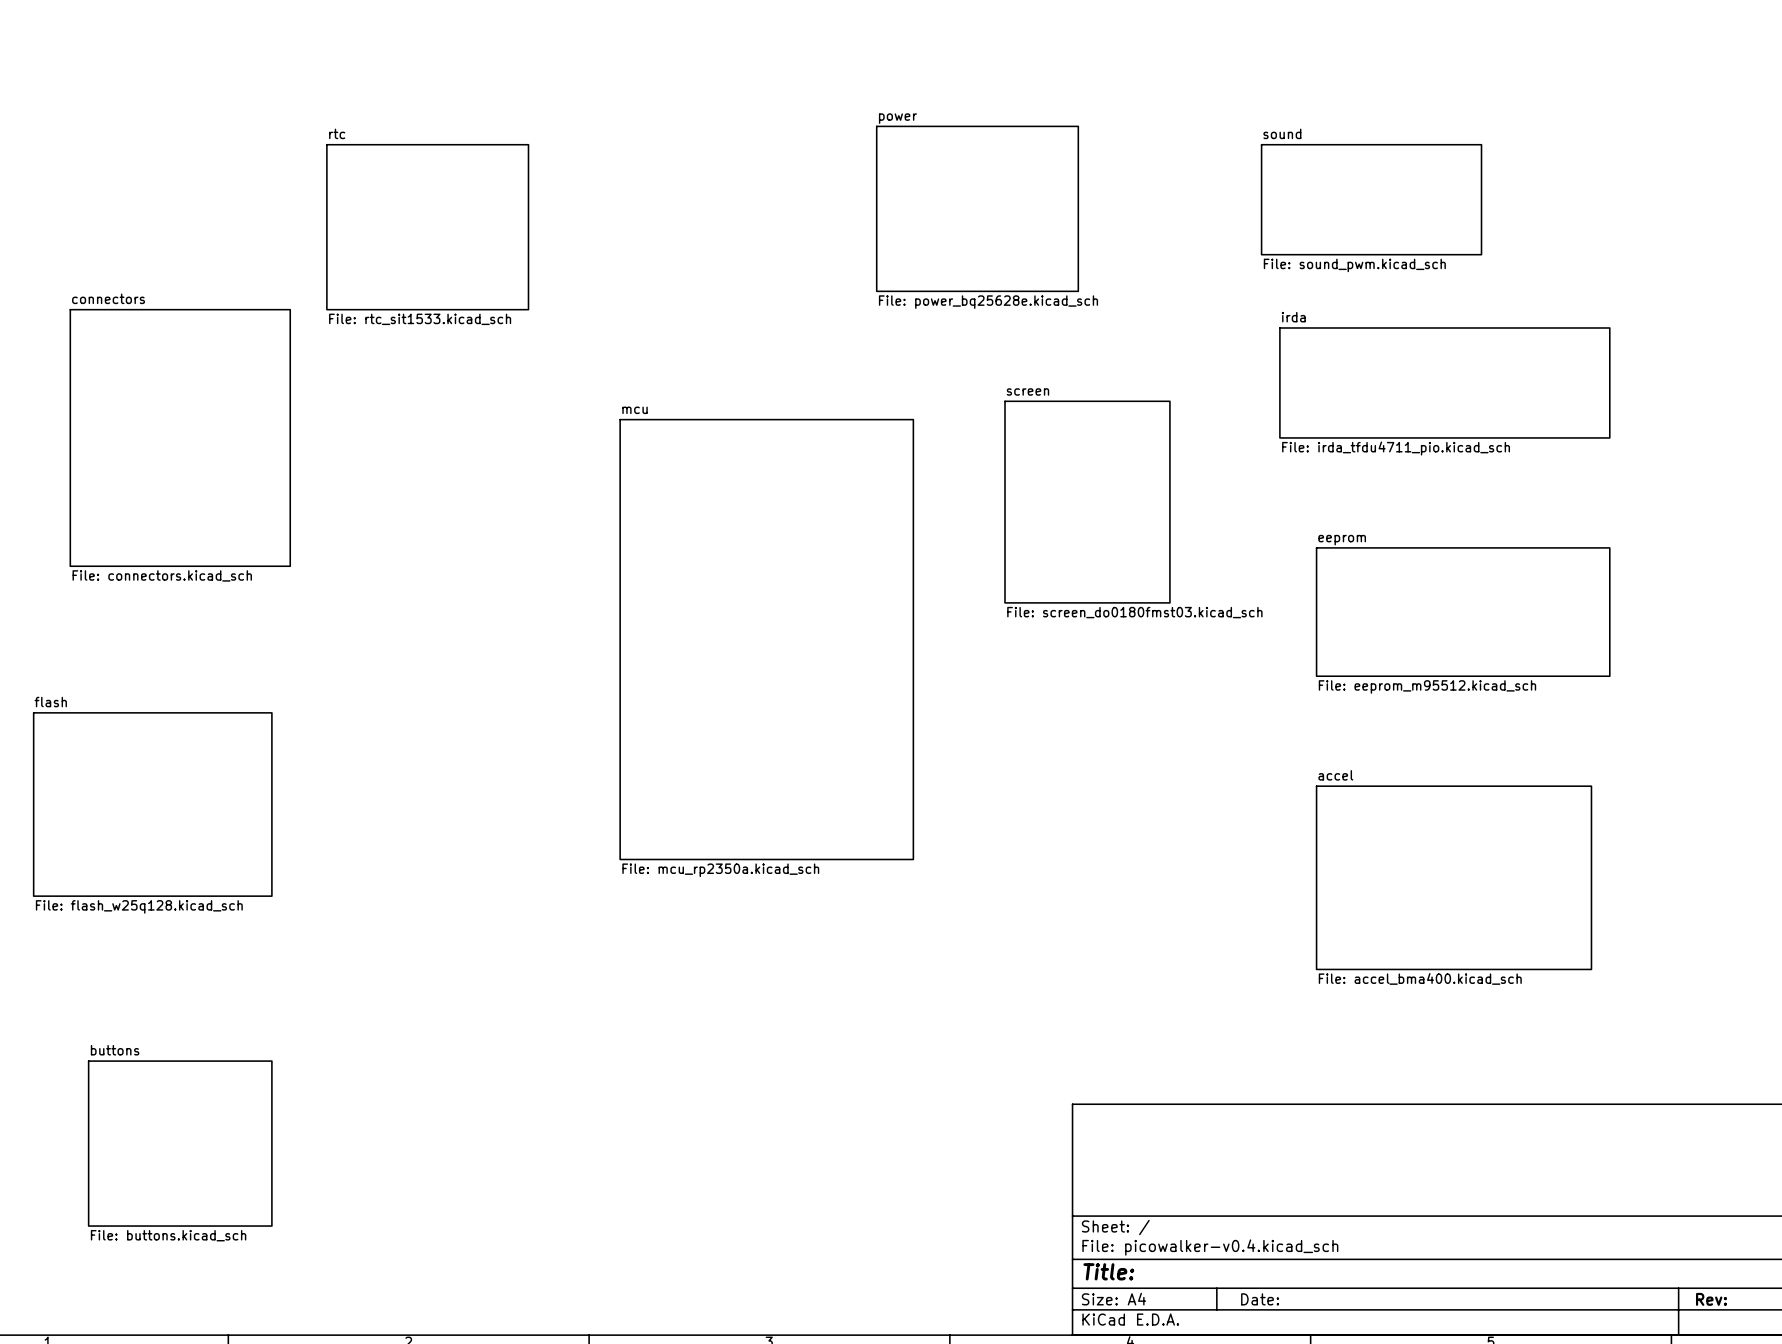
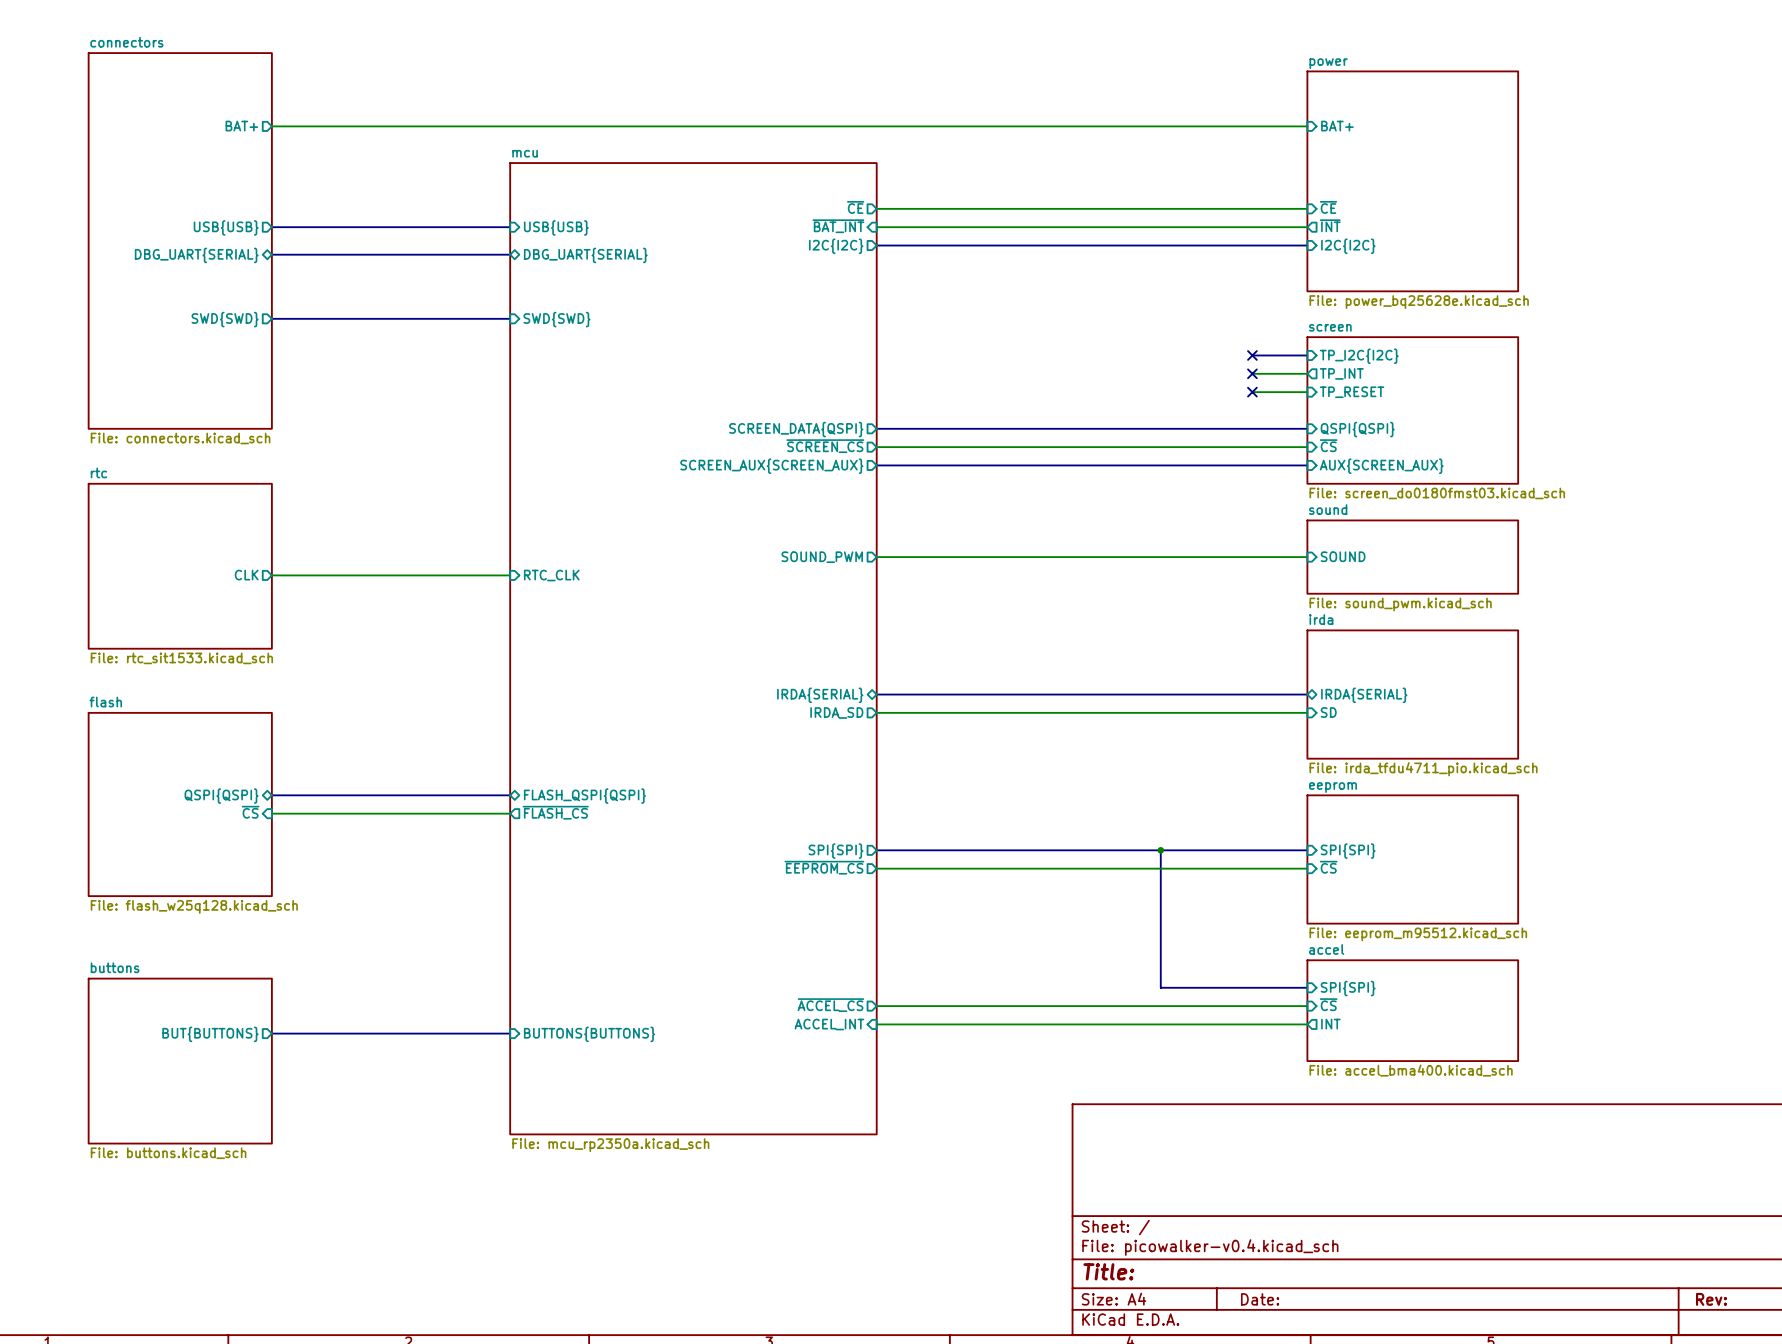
sheet pin: none -> BAT+ (241, 126)
wire: none -> (271, 126) (1307, 126)
sheet pin: none -> BAT+ (1337, 126)
sheet power: none -> File: power_bq25628e.kicad_sch (1412, 181)
sheet sound: File: sound_pwm.kicad_sch (1371, 199) -> none
sheet pin: none -> ~{CE} (855, 207)
sheet pin: none -> ~{CE} (1328, 207)
wire: none -> (876, 208) (1307, 208)
sheet power: File: power_bq25628e.kicad_sch (977, 208) -> none
sheet pin: none -> ~{INT} (1330, 225)
sheet pin: none -> ~{BAT_INT} (838, 226)
sheet pin: none -> USB{USB} (226, 227)
bus: none -> (271, 227) (510, 227)
sheet rtc: File: rtc_sit1533.kicad_sch (427, 227) -> none
sheet pin: none -> USB{USB} (556, 227)
wire: none -> (876, 227) (1307, 227)
sheet connectors: none -> File: connectors.kicad_sch (180, 240)
bus: none -> (876, 245) (1307, 245)
sheet pin: none -> I2C{I2C} (836, 246)
sheet pin: none -> I2C{I2C} (1348, 246)
bus: none -> (271, 254) (510, 254)
sheet pin: none -> DBG_UART{SERIAL} (196, 255)
sheet pin: none -> DBG_UART{SERIAL} (585, 255)
bus: none -> (271, 318) (510, 318)
sheet pin: none -> SWD{SWD} (225, 319)
sheet pin: none -> SWD{SWD} (557, 319)
bus: none -> (1252, 355) (1307, 355)
no-connect mark: none -> (1252, 355)
sheet pin: none -> TP_I2C{I2C} (1359, 356)
wire: none -> (1252, 373) (1307, 373)
no-connect mark: none -> (1252, 373)
sheet pin: none -> TP_INT (1341, 373)
sheet irda: File: irda_tfdu4711_pio.kicad_sch (1444, 382) -> none
wire: none -> (1252, 392) (1307, 392)
no-connect mark: none -> (1252, 392)
sheet pin: none -> TP_RESET (1352, 392)
sheet screen: none -> File: screen_do0180fmst03.kicad_sch (1412, 410)
bus: none -> (876, 428) (1307, 428)
sheet pin: none -> SCREEN_DATA{QSPI} (796, 429)
sheet pin: none -> QSPI{QSPI} (1357, 429)
sheet connectors: File: connectors.kicad_sch (180, 437) -> none
sheet pin: none -> ~{CS} (1328, 445)
sheet pin: none -> ~{SCREEN_CS} (825, 446)
wire: none -> (876, 447) (1307, 447)
bus: none -> (876, 465) (1307, 465)
sheet pin: none -> SCREEN_AUX{SCREEN_AUX} (771, 466)
sheet pin: none -> AUX{SCREEN_AUX} (1381, 466)
sheet screen: File: screen_do0180fmst03.kicad_sch (1087, 502) -> none
sheet pin: none -> SOUND (1343, 556)
sheet pin: none -> SOUND_PWM (822, 557)
wire: none -> (876, 557) (1307, 557)
sheet sound: none -> File: sound_pwm.kicad_sch (1412, 557)
sheet rtc: none -> File: rtc_sit1533.kicad_sch (180, 566)
sheet pin: none -> CLK (246, 575)
wire: none -> (271, 575) (510, 575)
sheet pin: none -> RTC_CLK (551, 575)
sheet eeprom: File: eeprom_m95512.kicad_sch (1463, 612) -> none
sheet mcu: File: mcu_rp2350a.kicad_sch (766, 639) -> none
sheet mcu: none -> File: mcu_rp2350a.kicad_sch (693, 648)
bus: none -> (876, 694) (1307, 694)
sheet irda: none -> File: irda_tfdu4711_pio.kicad_sch (1412, 694)
sheet pin: none -> IRDA{SERIAL} (820, 695)
sheet pin: none -> IRDA{SERIAL} (1364, 695)
sheet pin: none -> IRDA_SD (836, 712)
wire: none -> (876, 712) (1307, 712)
sheet pin: none -> SD (1328, 712)
bus: none -> (271, 795) (510, 795)
sheet pin: none -> QSPI{QSPI} (221, 796)
sheet pin: none -> FLASH_QSPI{QSPI} (584, 796)
sheet flash: File: flash_w25q128.kicad_sch (152, 804) -> none
sheet flash: none -> File: flash_w25q128.kicad_sch (180, 804)
sheet pin: none -> ~{CS} (250, 812)
sheet pin: none -> ~{FLASH_CS} (555, 812)
wire: none -> (271, 813) (510, 813)
bus: none -> (876, 850) (1307, 850)
bus: none -> (1160, 850) (1160, 987) (1307, 987)
junction: none -> (1160, 850)
sheet pin: none -> SPI{SPI} (835, 851)
sheet pin: none -> SPI{SPI} (1348, 851)
sheet eeprom: none -> File: eeprom_m95512.kicad_sch (1412, 859)
sheet pin: none -> ~{EEPROM_CS} (824, 867)
sheet pin: none -> ~{CS} (1328, 867)
wire: none -> (876, 868) (1307, 868)
sheet accel: File: accel_bma400.kicad_sch (1454, 877) -> none
sheet pin: none -> SPI{SPI} (1348, 988)
sheet pin: none -> ~{CS} (1328, 1004)
sheet pin: none -> ~{ACCEL_CS} (830, 1005)
wire: none -> (876, 1006) (1307, 1006)
sheet accel: none -> File: accel_bma400.kicad_sch (1412, 1010)
sheet pin: none -> ACCEL_INT (829, 1024)
wire: none -> (876, 1024) (1307, 1024)
sheet pin: none -> INT (1330, 1024)
bus: none -> (271, 1033) (510, 1033)
sheet pin: none -> BUT{BUTTONS} (210, 1034)
sheet pin: none -> BUTTONS{BUTTONS} (589, 1034)
sheet buttons position: (180, 1143) -> (180, 1061)

